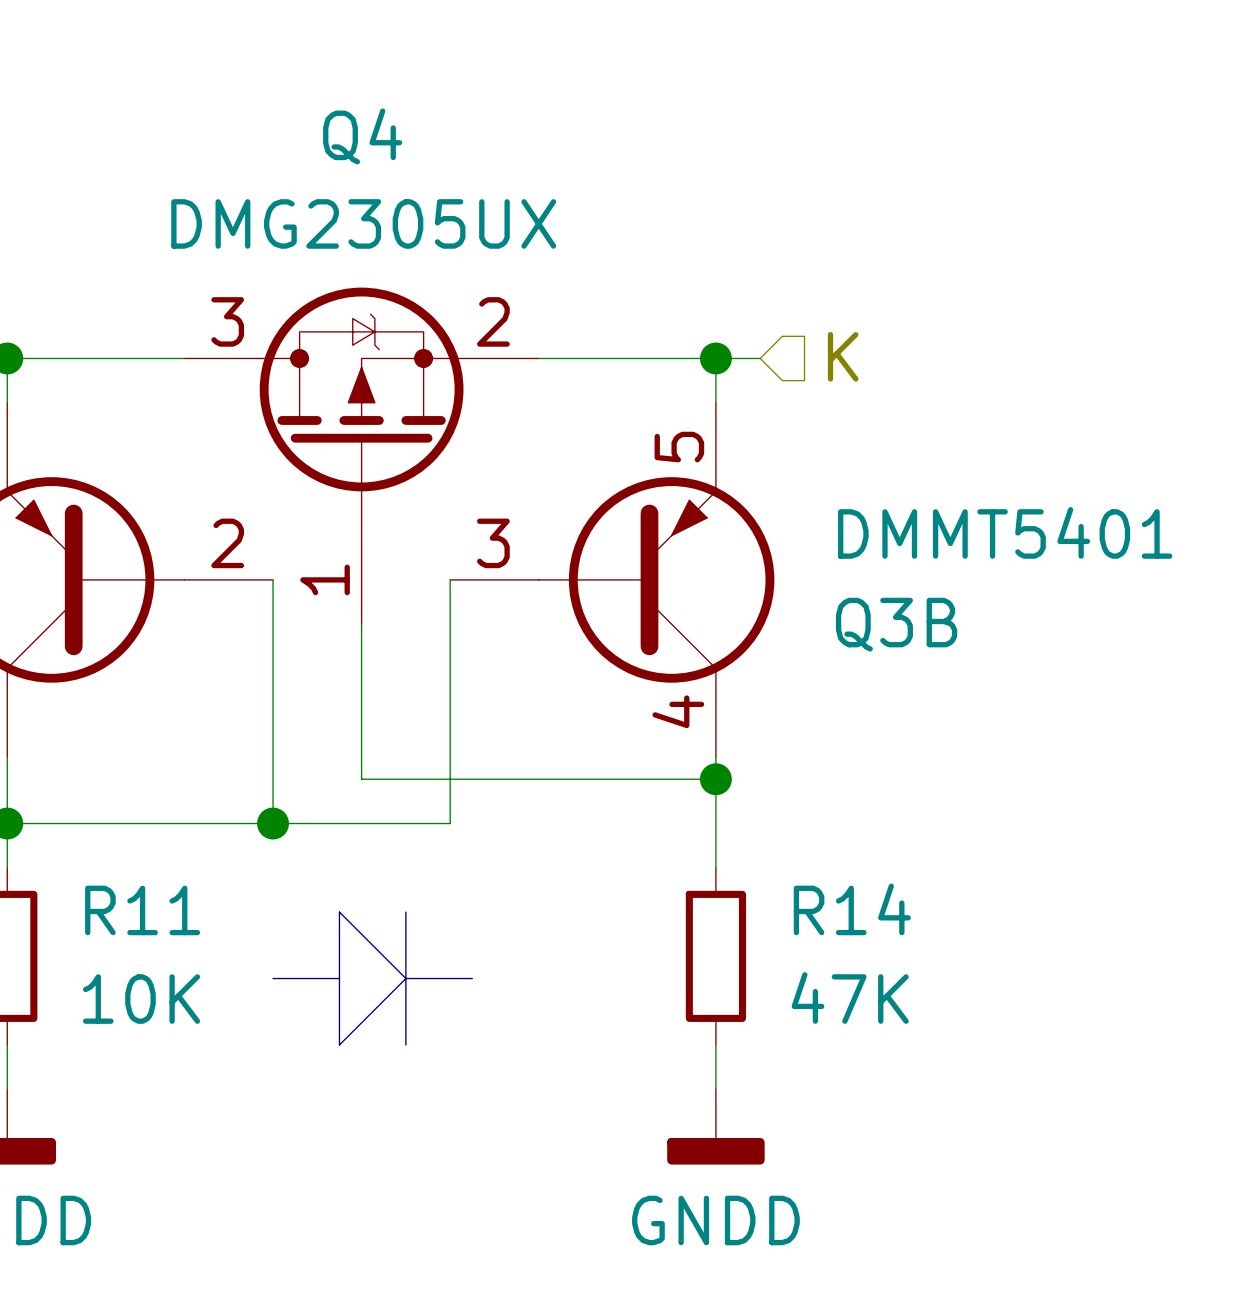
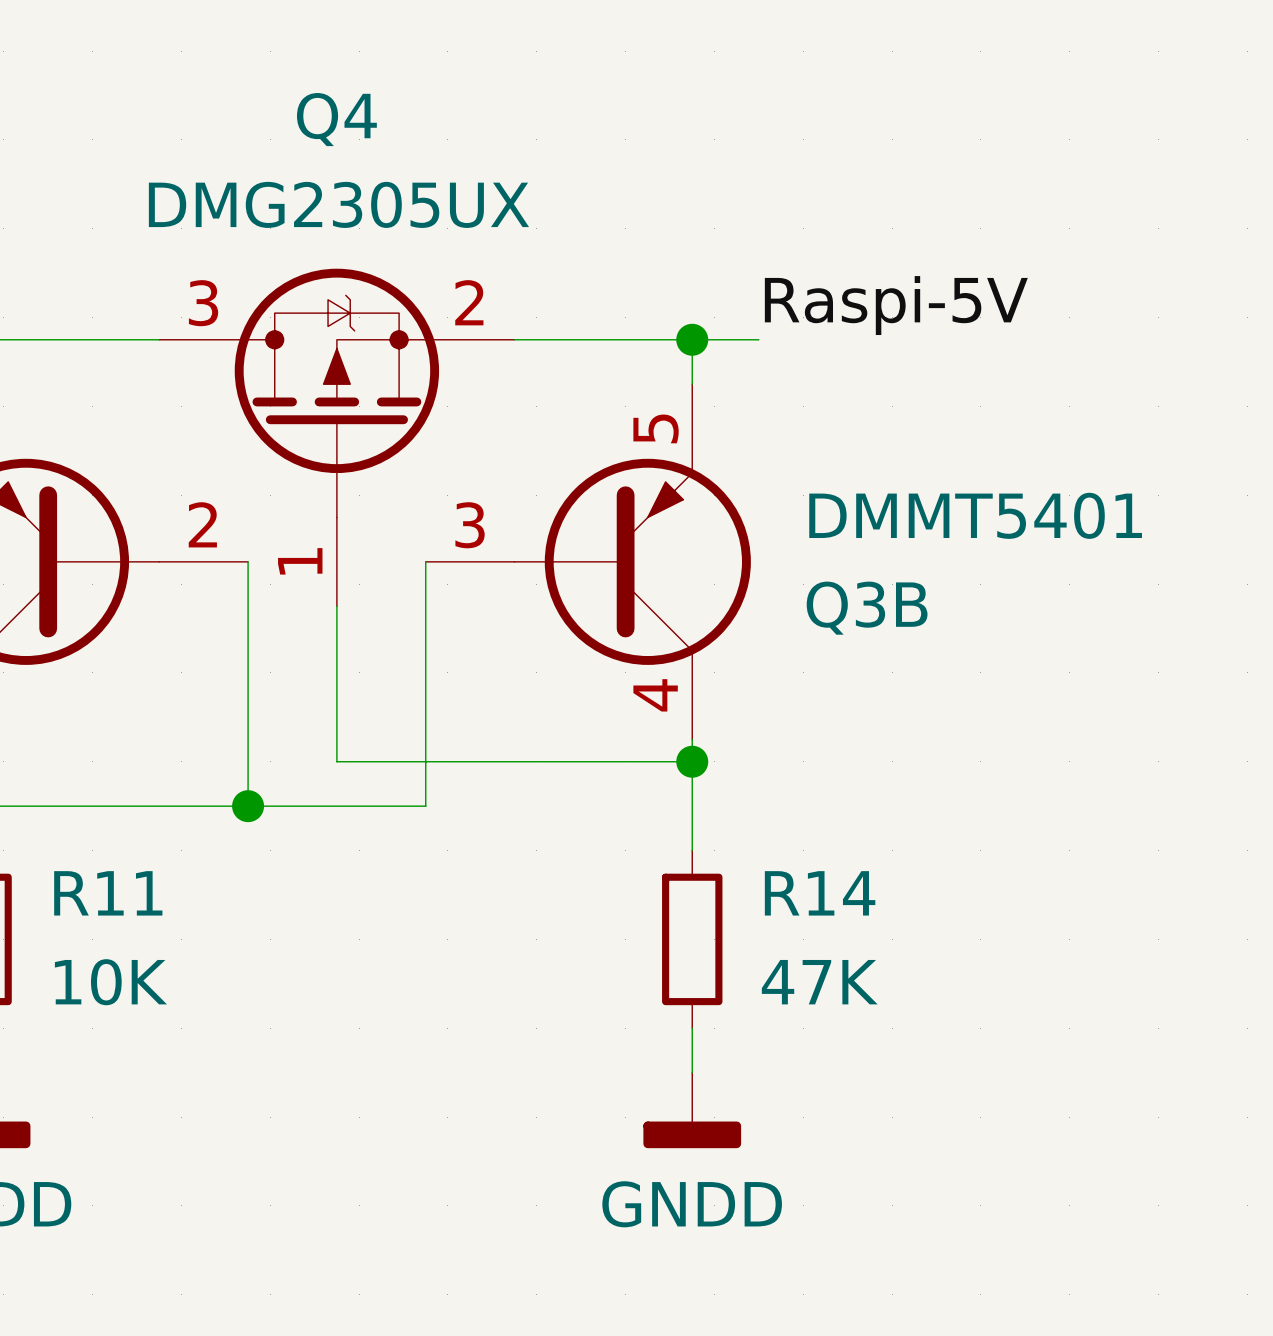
label: none -> Raspi-5V (896, 305)
hierarchical label: K (843, 356) -> none
wire: none -> (736, 339) (758, 339)
line: (405, 912) (405, 1044) -> none
line: (273, 978) (339, 978) -> none
line: (405, 978) (472, 978) -> none
line: (405, 978) (339, 912) (339, 1044) (405, 978) -> none

